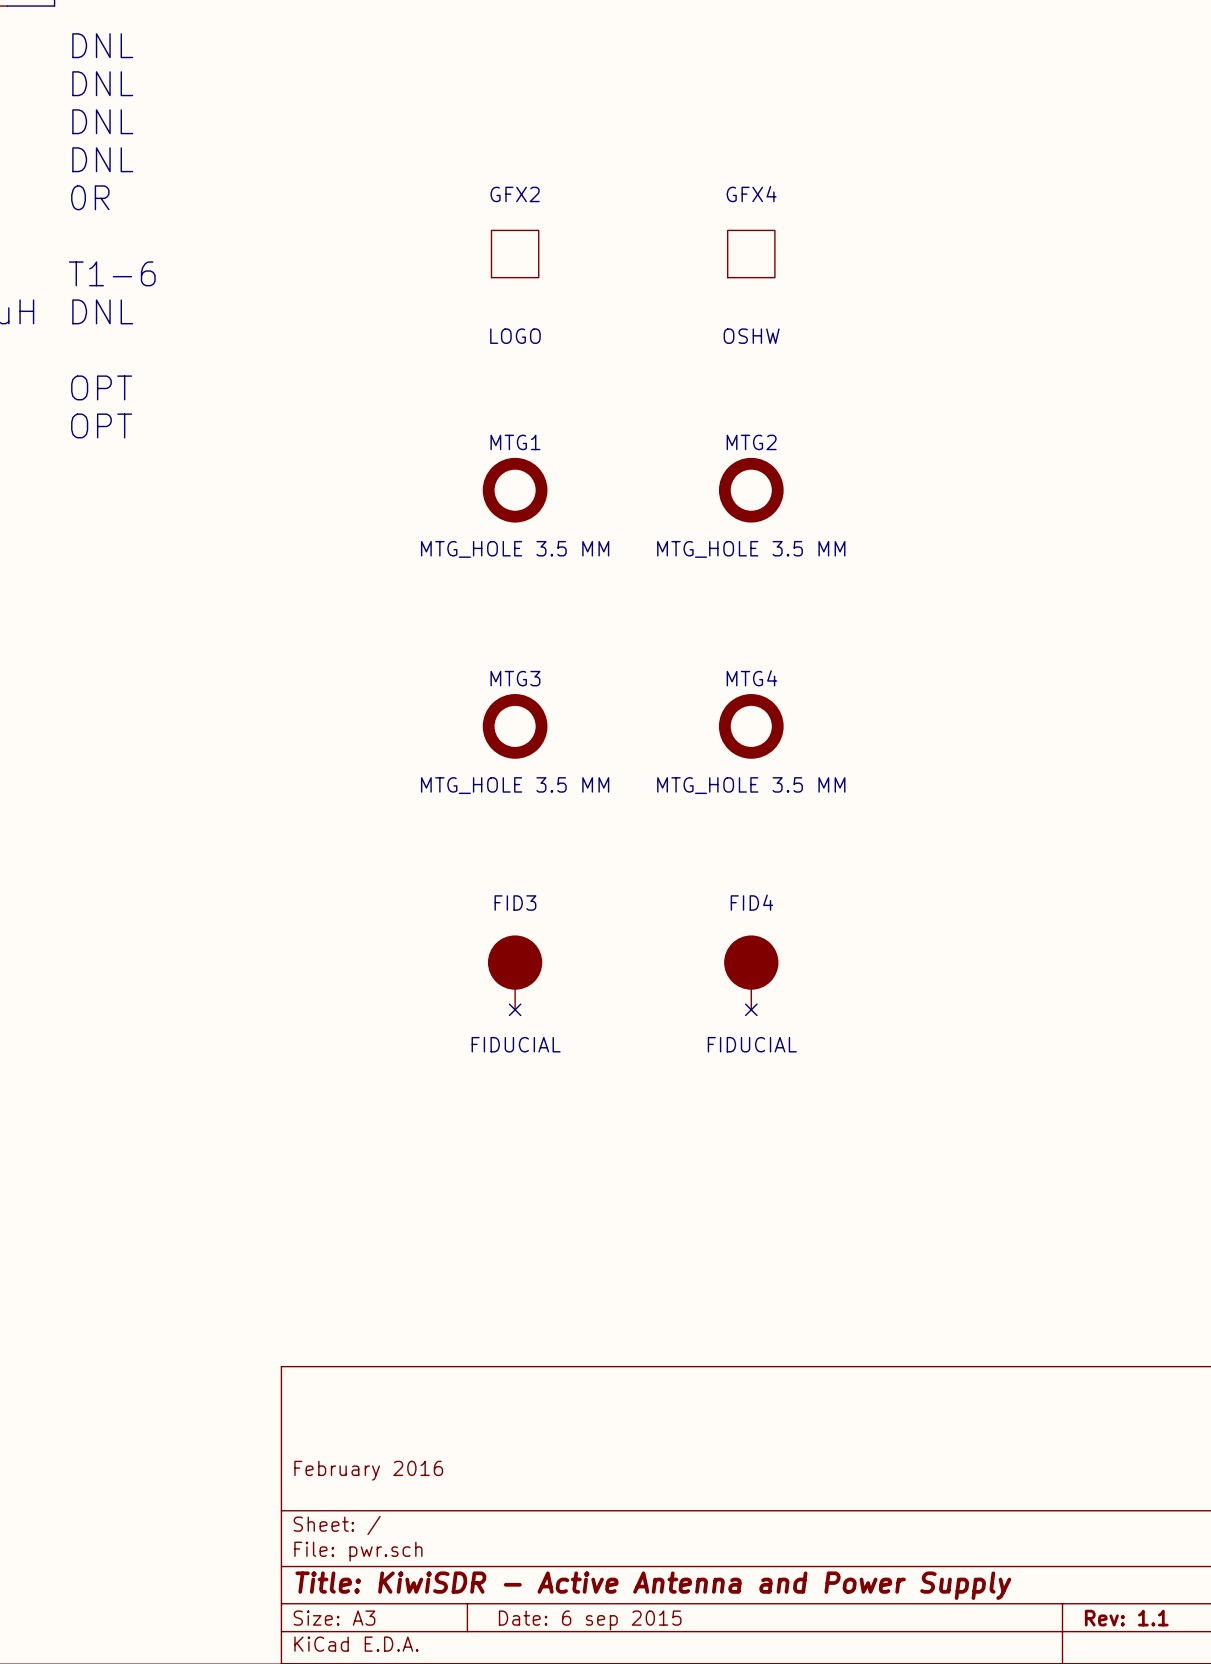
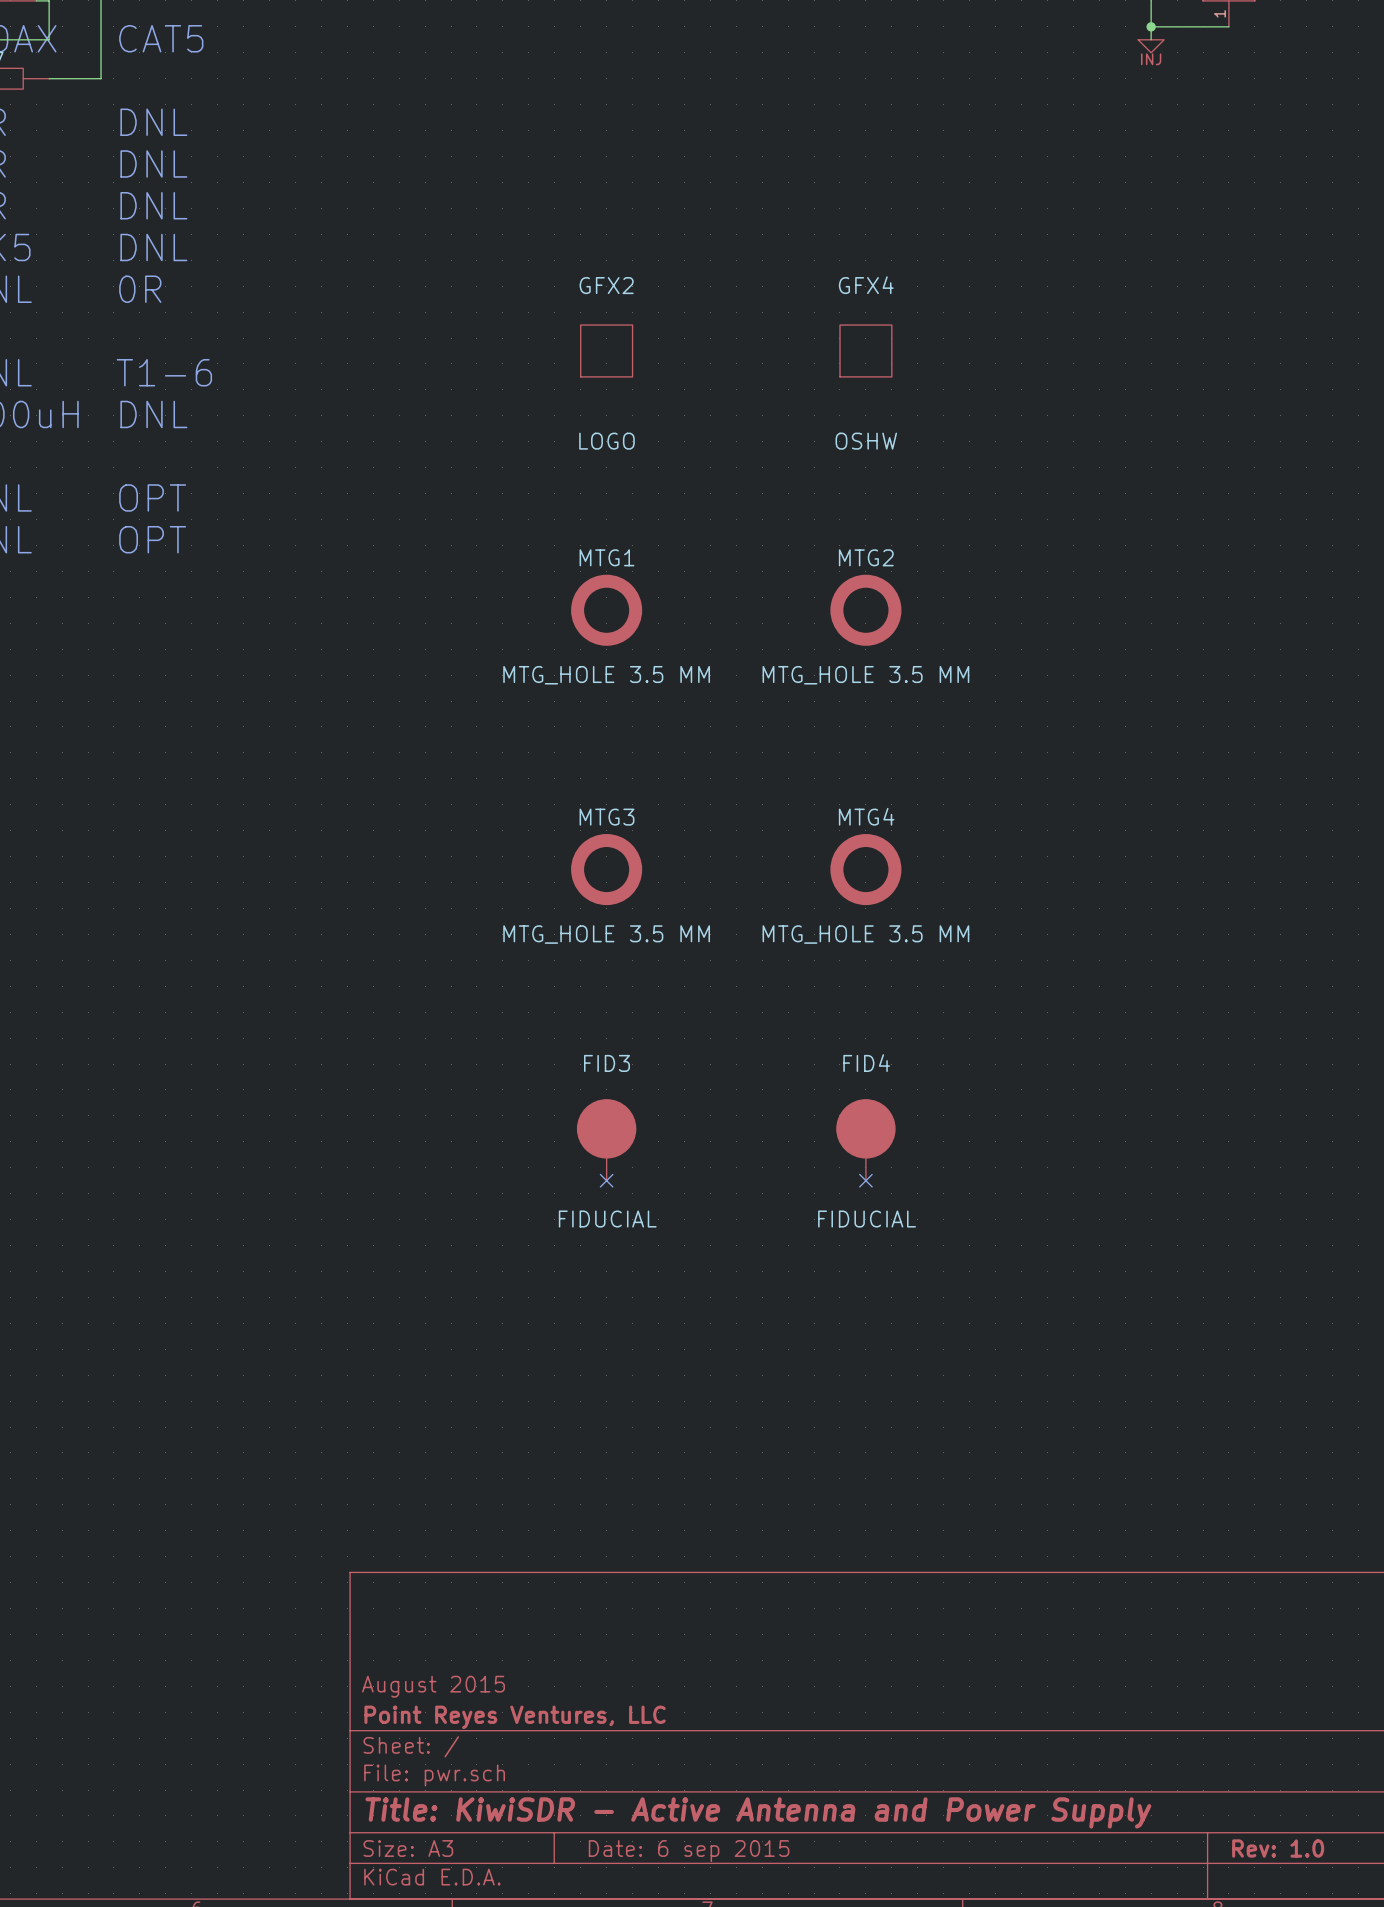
title block: February 2016 (368, 1470) -> August 2015 (433, 1686)
title block: none -> Point Reyes Ventures, LLC (515, 1717)
title block: Rev: 1.1 (1126, 1618) -> Rev: 1.0 (1278, 1848)

